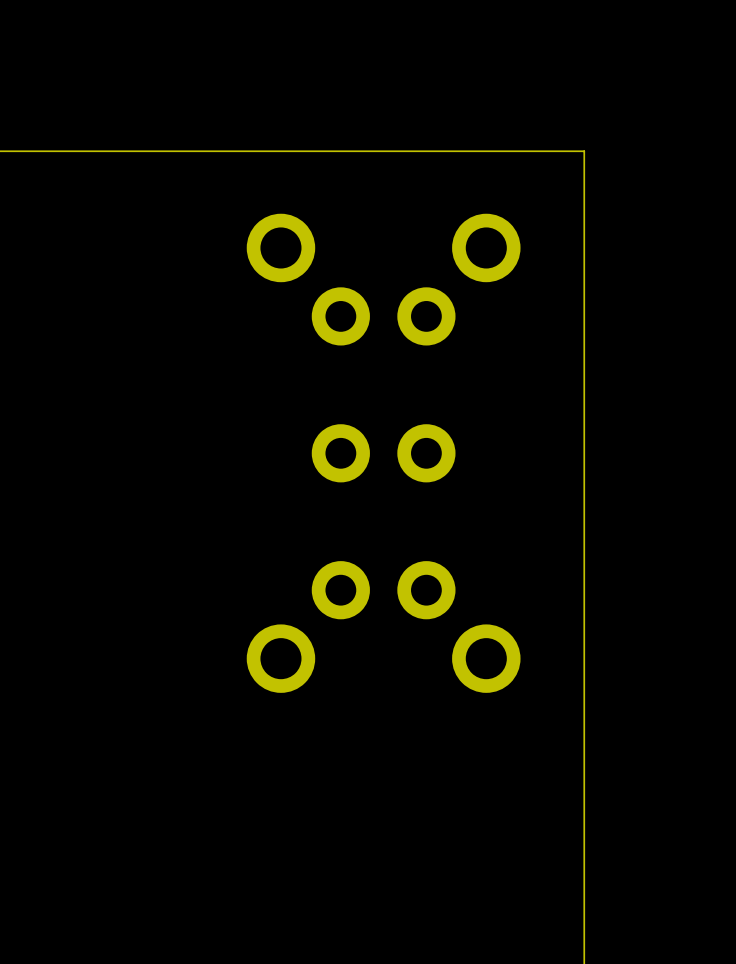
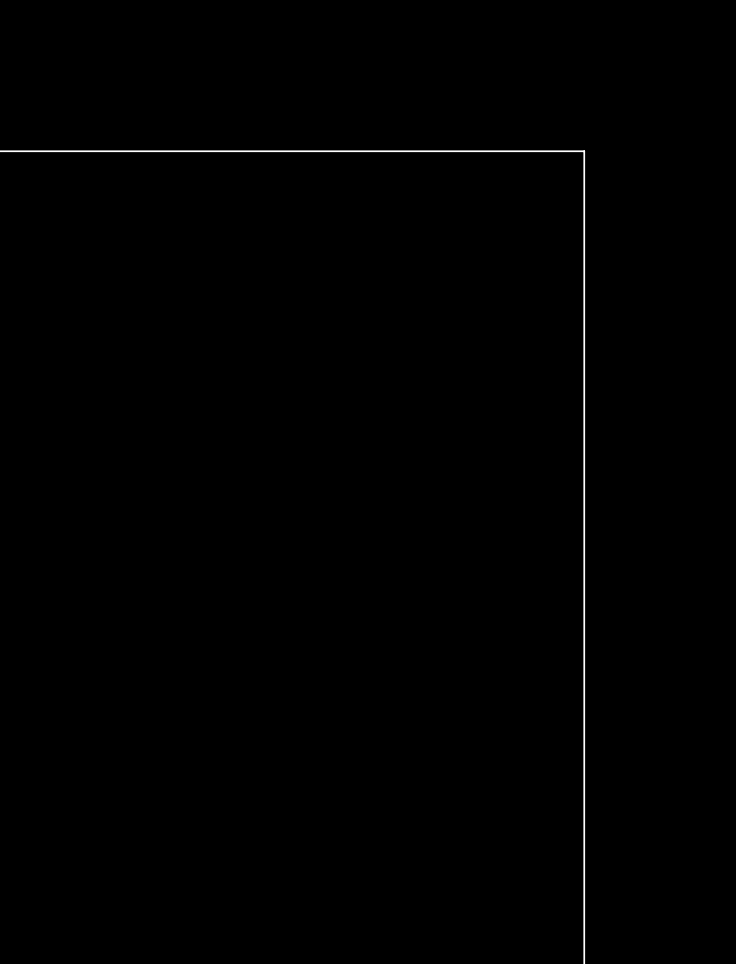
part: (383, 453) -> none

